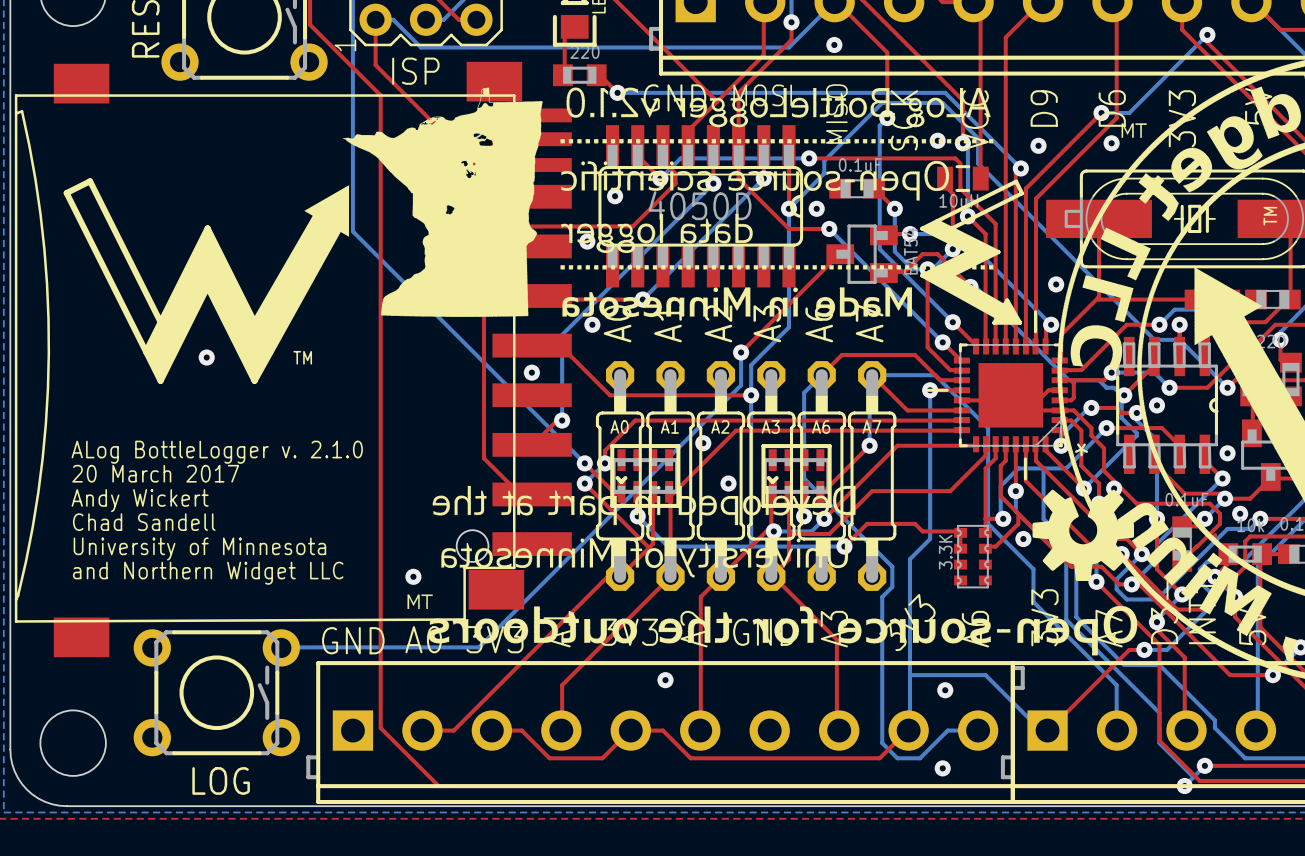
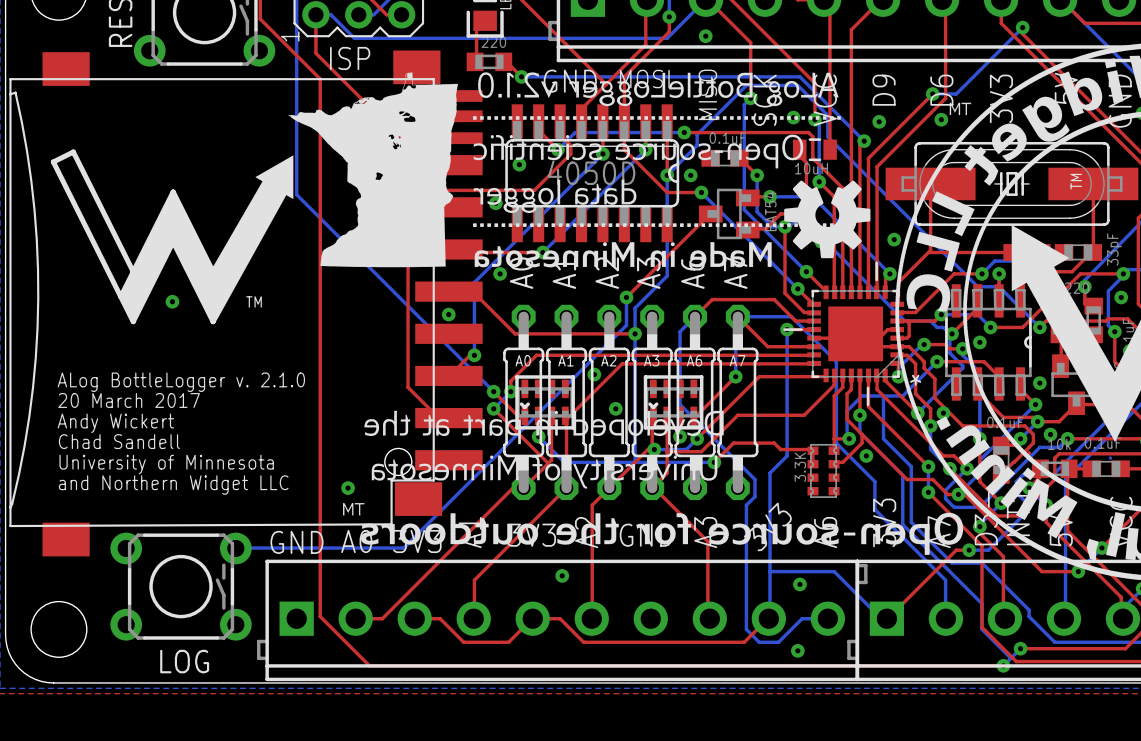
drawing: [920, 179, 1025, 325] -> none
drawing position: (1083, 535) -> (827, 219)

